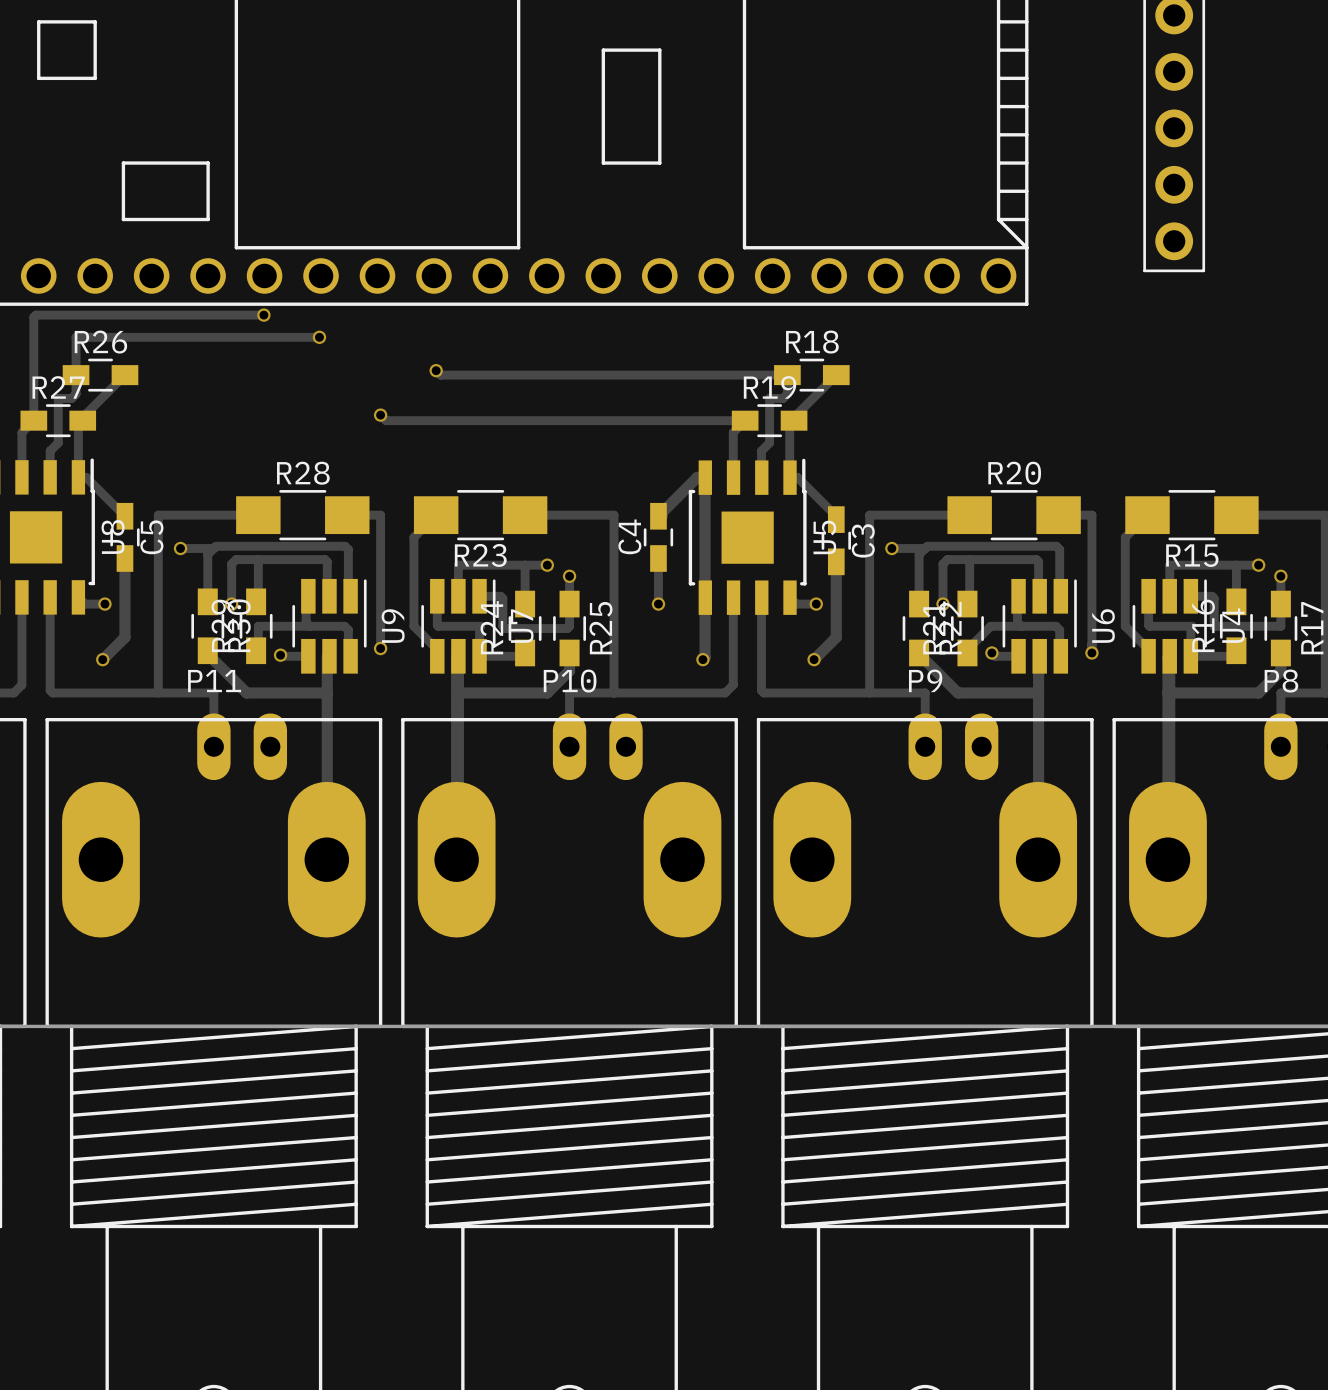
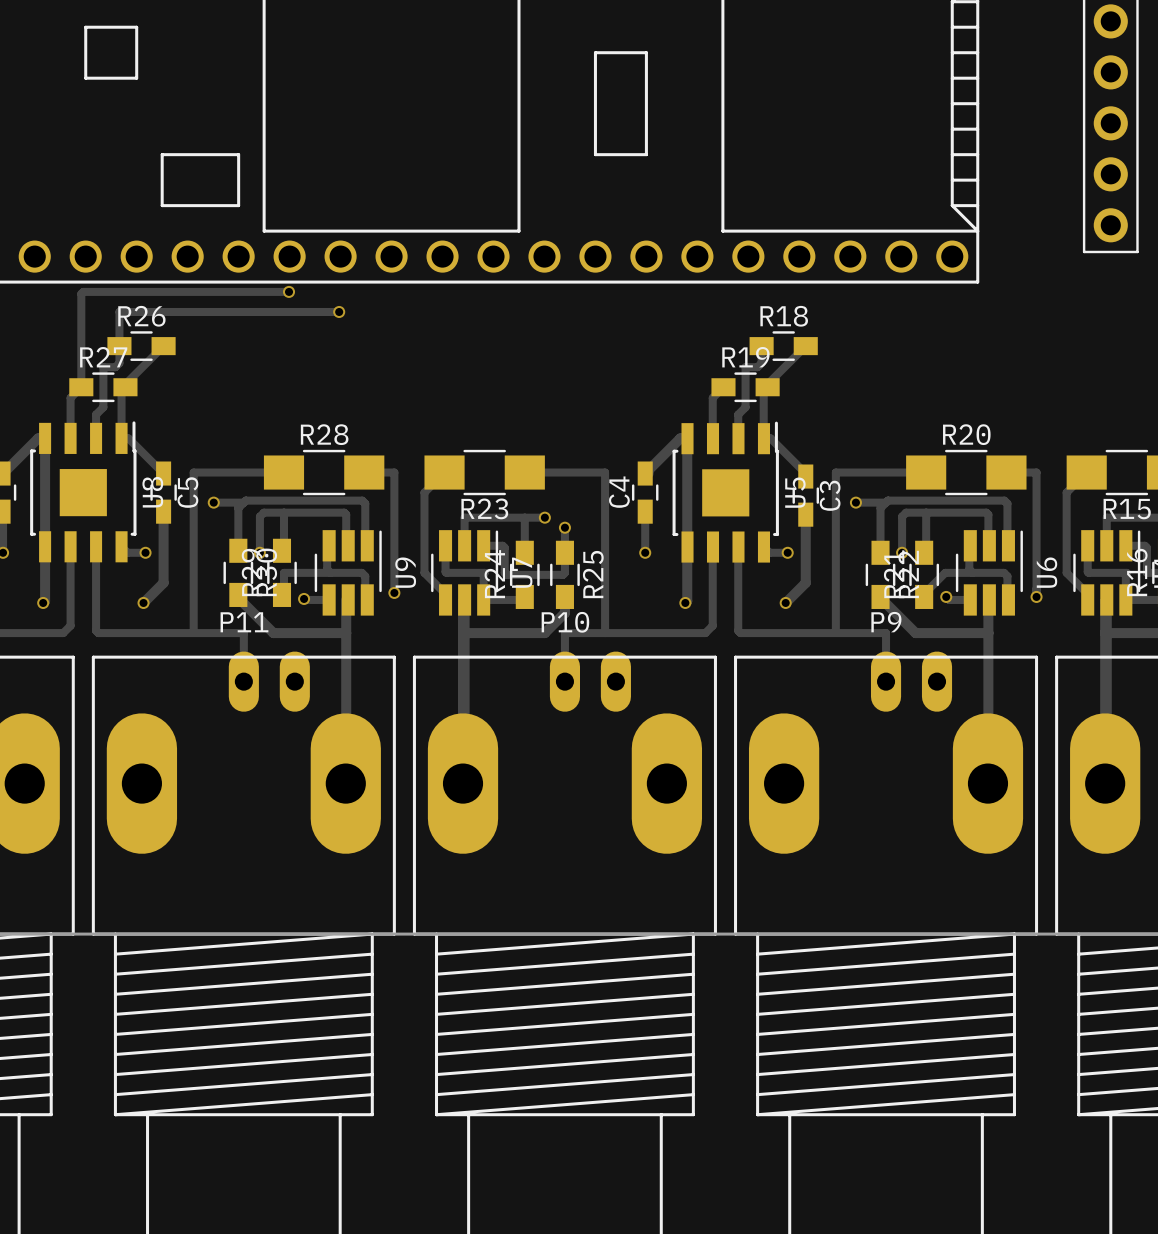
track: (436, 370) (440, 375) (787, 375) -> none
via: (436, 370) -> none
track: (380, 415) (386, 420) (745, 420) -> none
via: (380, 415) -> none

